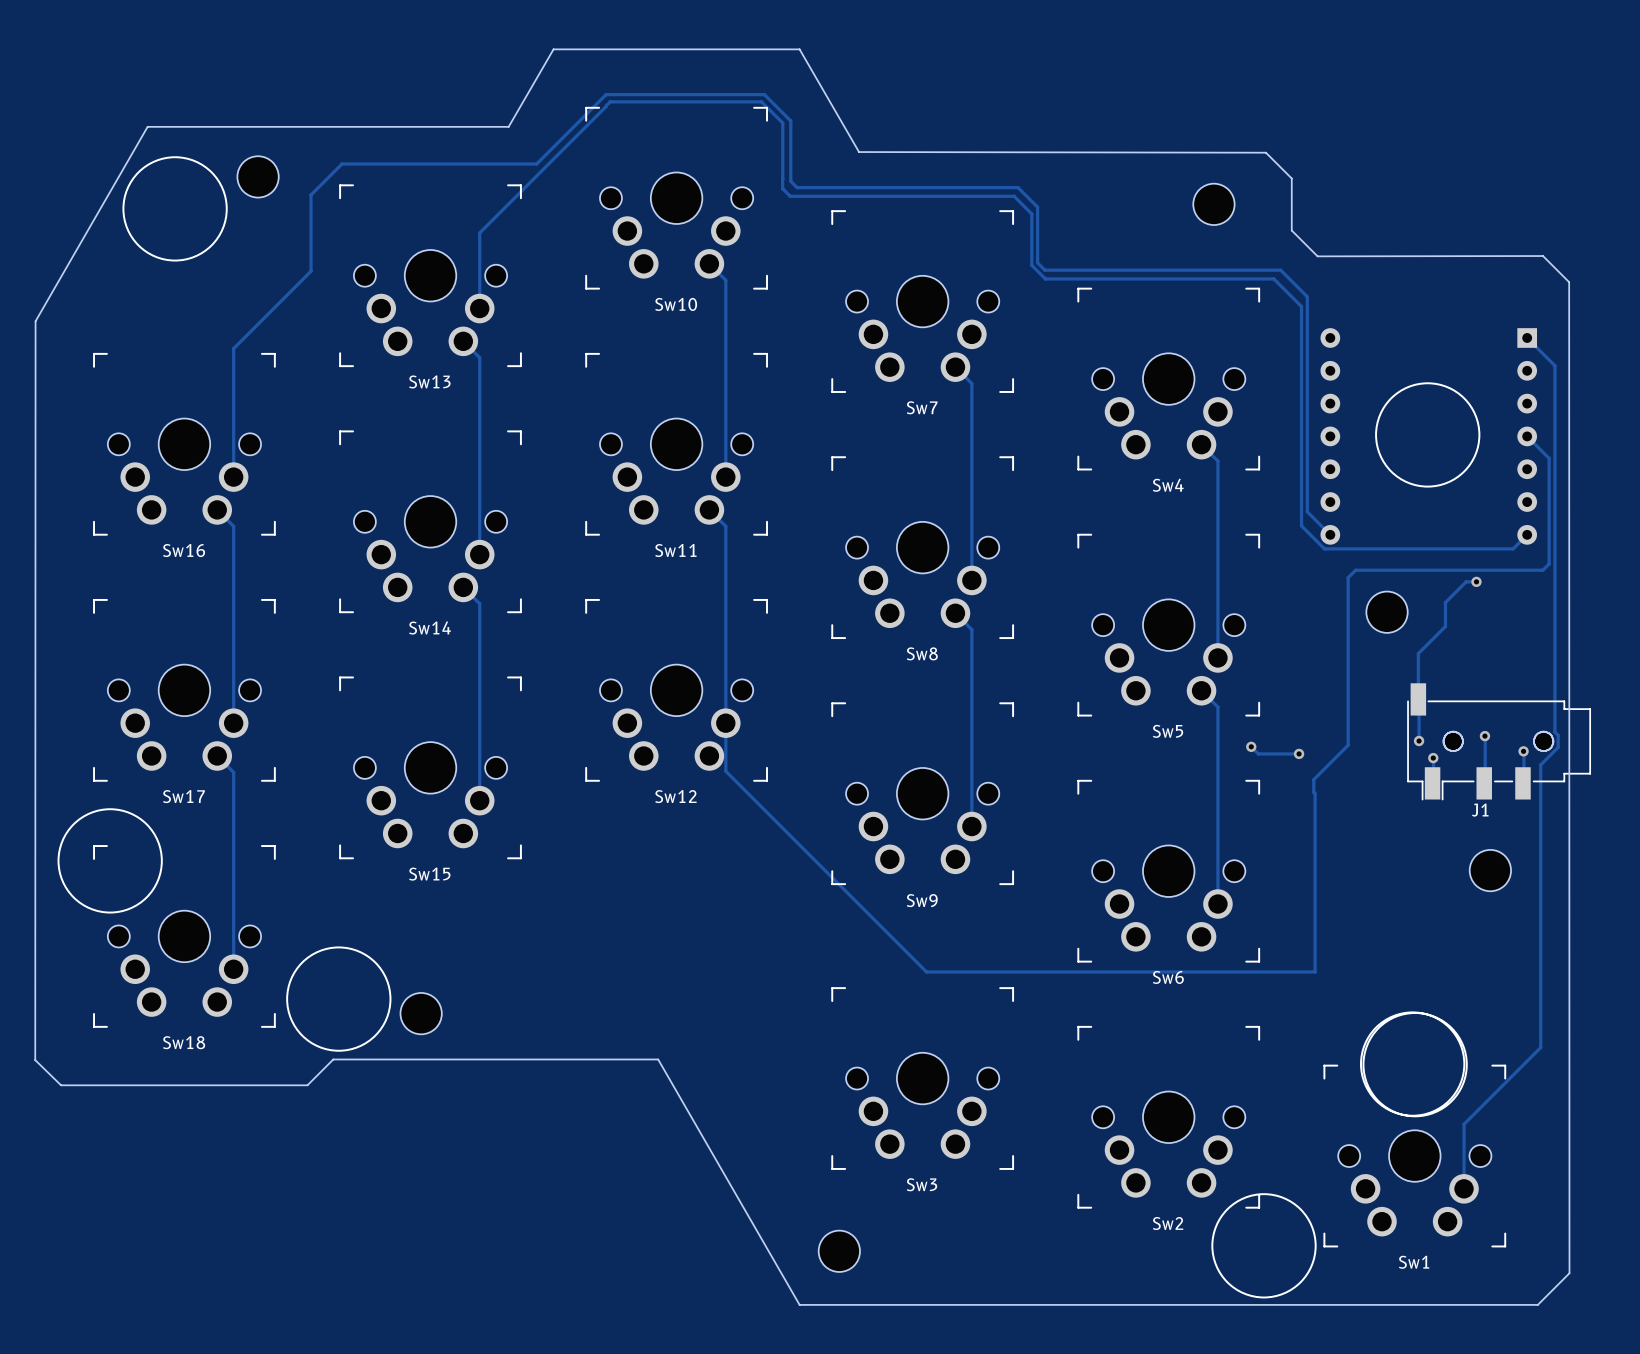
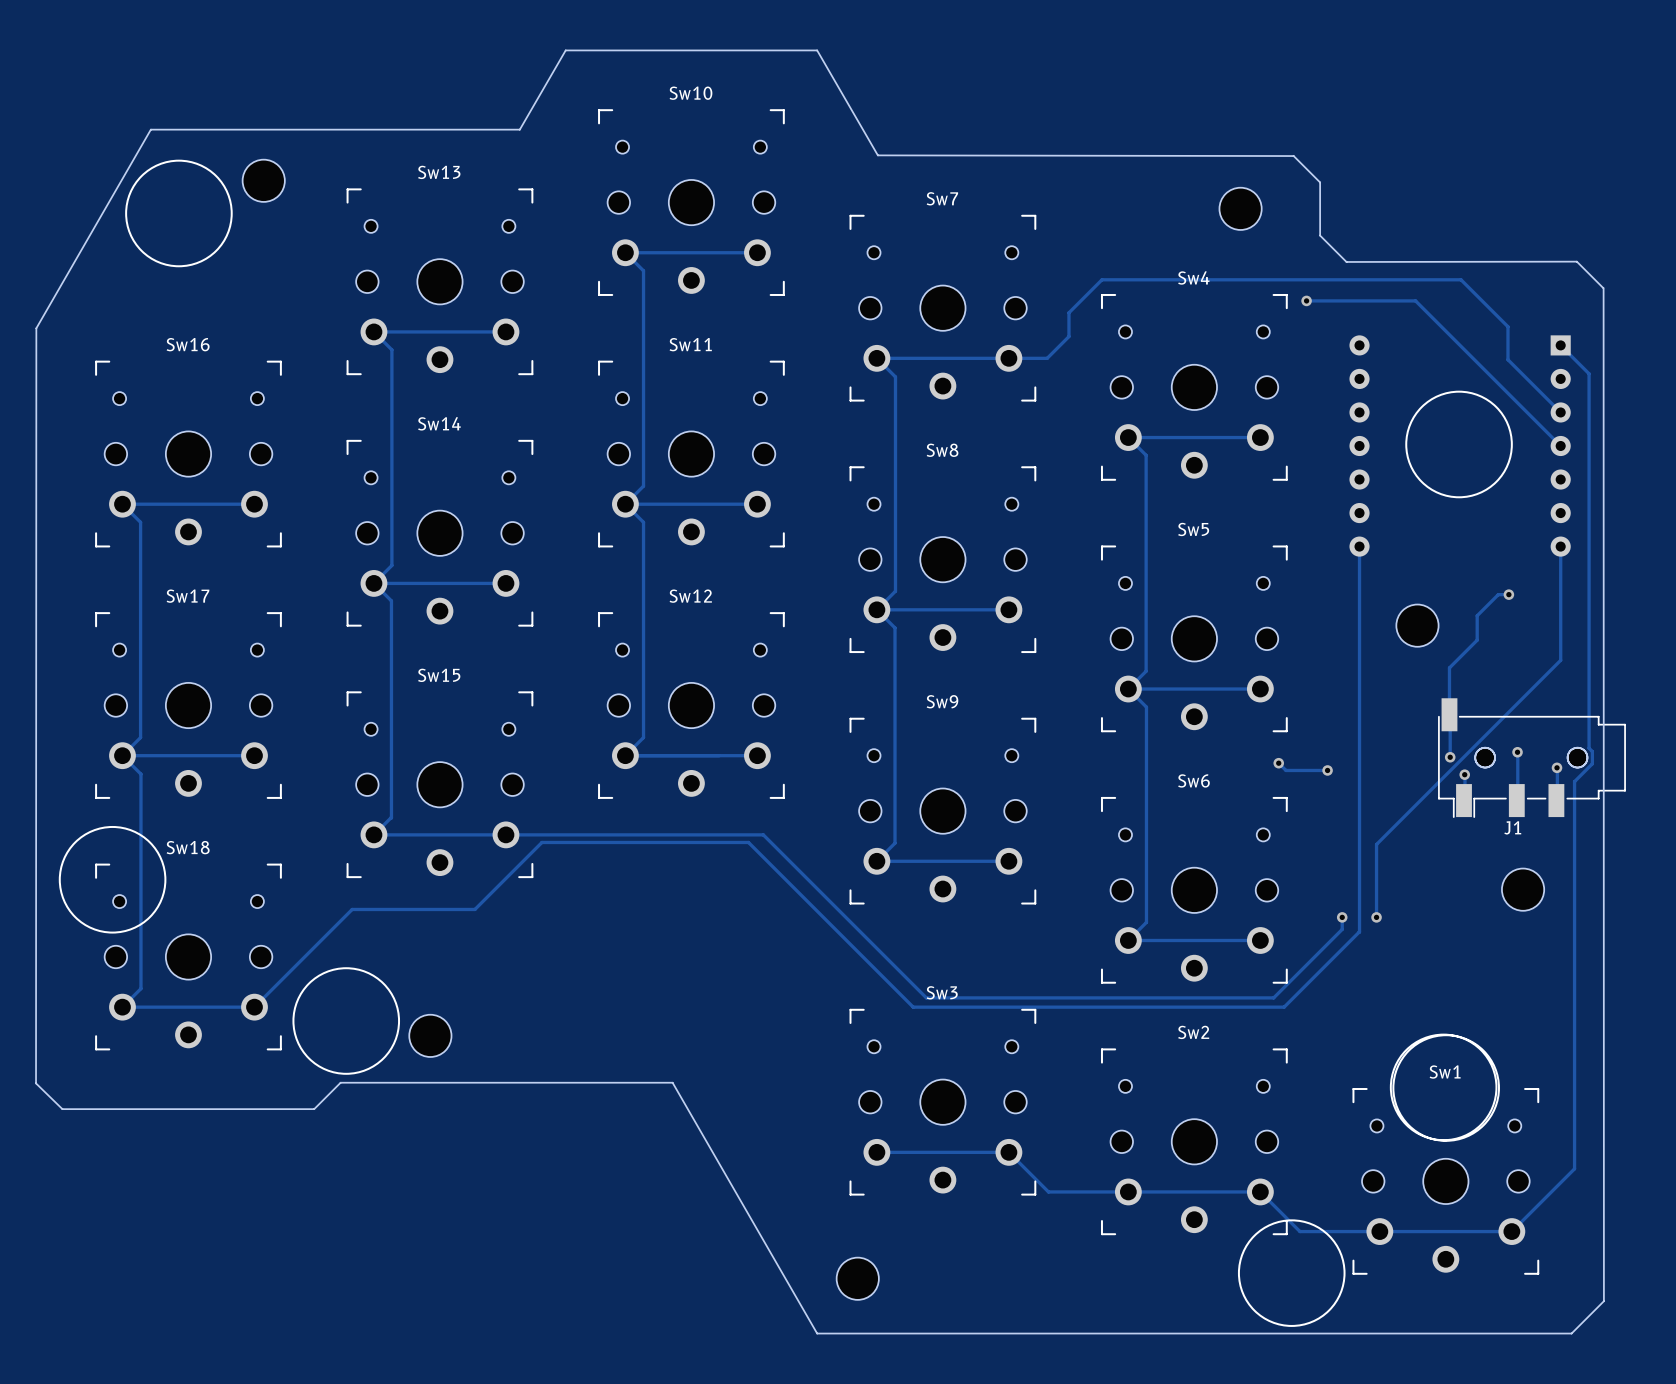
Sw10 footprint: [585, 106, 768, 290] -> [598, 109, 785, 296]
track: (782, 178) (782, 188) (790, 196) (1014, 196) (1031, 213) (1031, 265) (1045, 278) (1273, 278) (1301, 306) (1301, 525) (1324, 548) (1513, 548) (1527, 534) -> (1376, 917) (1376, 844) (1560, 660) (1560, 546)
track: (782, 178) (782, 123) (761, 101) (610, 101) (479, 232) (479, 308) -> none
Sw13 footprint: [339, 184, 522, 368] -> [346, 188, 534, 376]
Sw7 footprint: [831, 210, 1015, 393] -> [849, 214, 1037, 402]
track: none -> (757, 252) (625, 252) (643, 270) (643, 486) (625, 504)
track: (709, 263) (725, 280) (725, 477) -> none
Sw4 footprint: [1077, 287, 1261, 471] -> [1100, 293, 1288, 481]
via: none -> (1306, 300)
Sw10 name position: Sw10 (676, 304) -> Sw10 (690, 93)
track: none -> (505, 331) (373, 331) (391, 349) (391, 565) (373, 583)
track: (463, 341) (479, 357) (479, 554) -> none
Sw16 footprint: [93, 352, 276, 536] -> [95, 360, 282, 548]
Sw11 footprint: [585, 352, 768, 536] -> [598, 360, 785, 548]
track: (955, 367) (971, 383) (971, 580) -> none
Sw13 name position: Sw13 (429, 381) -> Sw13 (439, 172)
track: none -> (1560, 412) (1507, 359) (1507, 326) (1461, 279) (1101, 279) (1068, 312) (1068, 336) (1047, 358) (876, 358) (895, 376) (895, 591) (876, 609)
Sw7 name position: Sw7 (922, 407) -> Sw7 (942, 198)
track: none -> (1260, 437) (1128, 437) (1146, 455) (1146, 671) (1128, 689)
Sw14 footprint: [339, 430, 522, 614] -> [346, 439, 534, 627]
track: (1527, 436) (1549, 458) (1549, 564) (1542, 570) (1355, 570) (1348, 577) (1348, 745) (1313, 779) (1315, 971) (926, 971) (725, 771) (725, 526) (709, 509) -> (1560, 445) (1415, 300) (1306, 300)
track: (1201, 444) (1217, 461) (1217, 657) -> none
Sw8 footprint: [831, 456, 1015, 640] -> [849, 466, 1037, 654]
track: (233, 477) (233, 348) (311, 271) (311, 195) (342, 163) (536, 163) (606, 94) (764, 94) (790, 120) (790, 181) (797, 187) (1018, 187) (1037, 207) (1037, 262) (1044, 270) (1280, 270) (1307, 296) (1307, 511) (1330, 534) -> (1359, 932) (1359, 546)
Sw4 name position: Sw4 (1168, 485) -> Sw4 (1193, 277)
track: none -> (254, 504) (122, 504) (140, 522) (140, 737) (122, 755)
track: none -> (625, 504) (643, 522) (643, 737) (625, 755) (757, 755)
track: none -> (757, 504) (625, 504)
track: (217, 509) (233, 526) (233, 723) -> none
Sw5 footprint: [1077, 533, 1261, 717] -> [1100, 545, 1288, 733]
Sw16 name position: Sw16 (184, 550) -> Sw16 (188, 344)
Sw11 name position: Sw11 (675, 550) -> Sw11 (690, 344)
track: none -> (373, 583) (391, 600) (391, 817) (373, 834) (763, 834) (926, 997) (1273, 997) (1342, 929) (1342, 917)
track: none -> (505, 583) (373, 583)
track: (463, 587) (479, 603) (479, 800) -> none
track: none -> (876, 609) (895, 627) (895, 843) (876, 861) (1008, 861)
track: none -> (1008, 609) (876, 609)
Sw17 footprint: [93, 598, 276, 782] -> [95, 612, 282, 799]
Sw12 footprint: [585, 598, 768, 782] -> [598, 612, 785, 799]
track: (955, 613) (971, 629) (971, 826) -> none
Sw14 name position: Sw14 (430, 628) -> Sw14 (439, 423)
Sw8 name position: Sw8 (922, 653) -> Sw8 (942, 450)
track: none -> (1128, 689) (1146, 707) (1146, 922) (1128, 940) (1260, 940)
track: none -> (1260, 689) (1128, 689)
Sw15 footprint: [339, 676, 522, 860] -> [346, 691, 534, 879]
track: (1201, 690) (1217, 707) (1217, 904) -> none
Sw9 footprint: [831, 702, 1015, 886] -> [849, 717, 1037, 905]
Sw5 name position: Sw5 (1168, 731) -> Sw5 (1193, 529)
track: none -> (122, 755) (140, 774) (140, 988) (122, 1007) (254, 1007) (352, 909) (474, 909) (541, 842) (748, 842) (913, 1007) (1284, 1007) (1359, 932)
track: none -> (254, 755) (122, 755)
track: (217, 755) (233, 772) (233, 969) -> none
Sw6 footprint: [1077, 779, 1261, 963] -> [1100, 796, 1288, 984]
Sw17 name position: Sw17 (183, 796) -> Sw17 (187, 596)
Sw12 name position: Sw12 (675, 796) -> Sw12 (690, 596)
Sw18 footprint: [93, 845, 276, 1028] -> [95, 863, 282, 1051]
Sw15 name position: Sw15 (429, 874) -> Sw15 (439, 675)
via: none -> (1342, 917)
via: none -> (1376, 917)
Sw9 name position: Sw9 (922, 900) -> Sw9 (942, 701)
Sw6 name position: Sw6 (1168, 977) -> Sw6 (1193, 780)
Sw3 footprint: [831, 987, 1015, 1170] -> [849, 1008, 1037, 1196]
Sw2 footprint: [1077, 1025, 1261, 1209] -> [1100, 1048, 1288, 1236]
Sw18 name position: Sw18 (184, 1042) -> Sw18 (188, 847)
track: (1540, 1047) (1464, 1124) (1464, 1188) -> (1574, 1070) (1574, 1168) (1511, 1231) (1299, 1231) (1260, 1191) (1048, 1191) (1008, 1152) (876, 1152)
Sw1 footprint: [1323, 1064, 1507, 1248] -> [1352, 1088, 1540, 1275]
Sw3 name position: Sw3 (921, 1184) -> Sw3 (942, 992)
Sw2 name position: Sw2 (1168, 1223) -> Sw2 (1193, 1032)
Sw1 name position: Sw1 (1414, 1262) -> Sw1 (1445, 1072)

